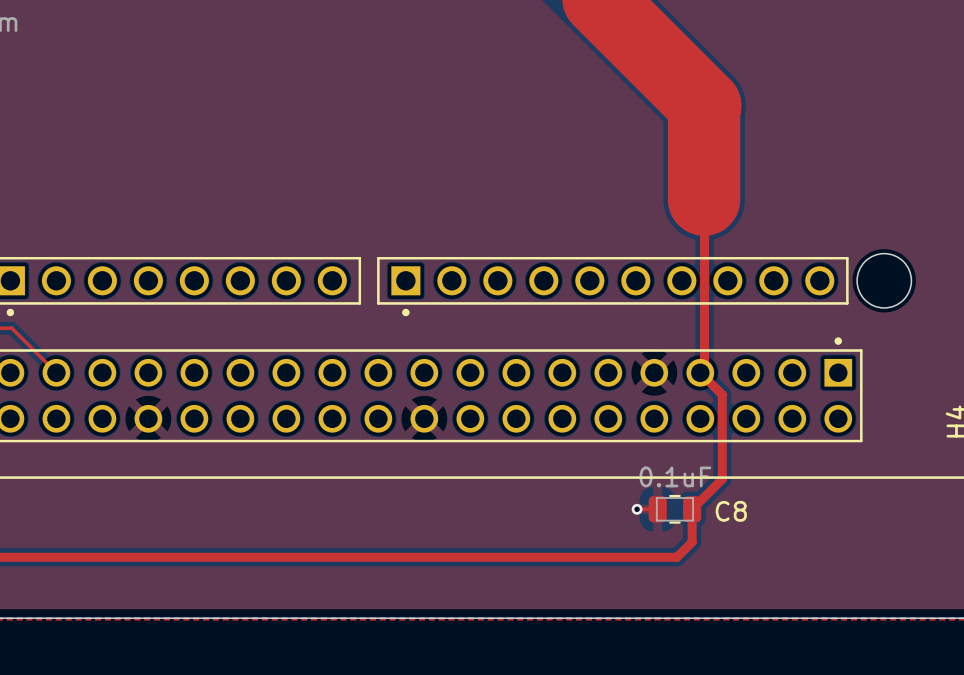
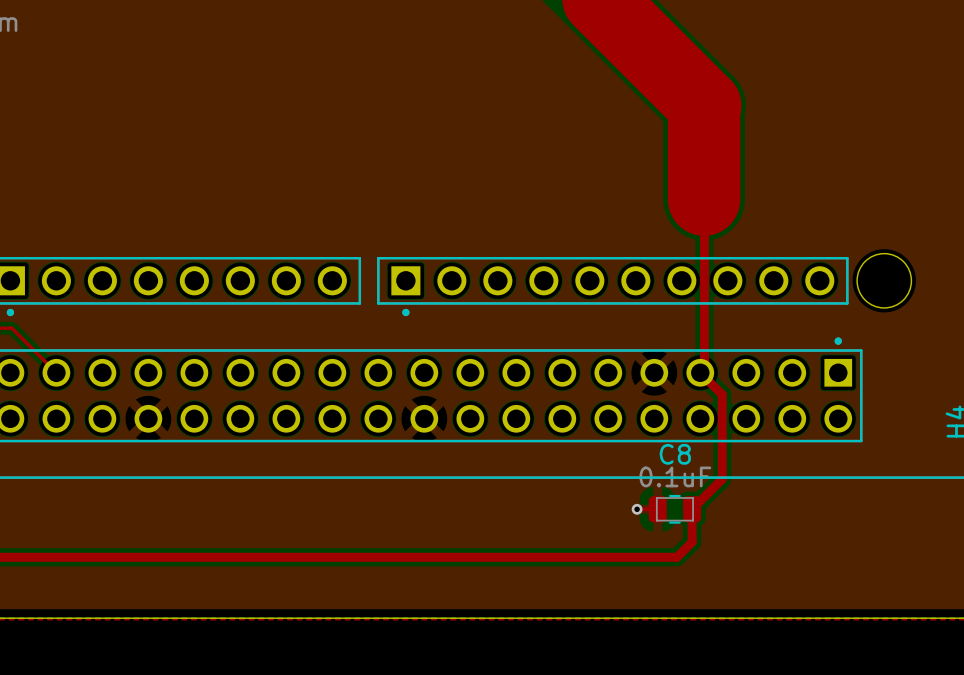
C8 name position: C8 (731, 511) -> C8 (675, 454)

